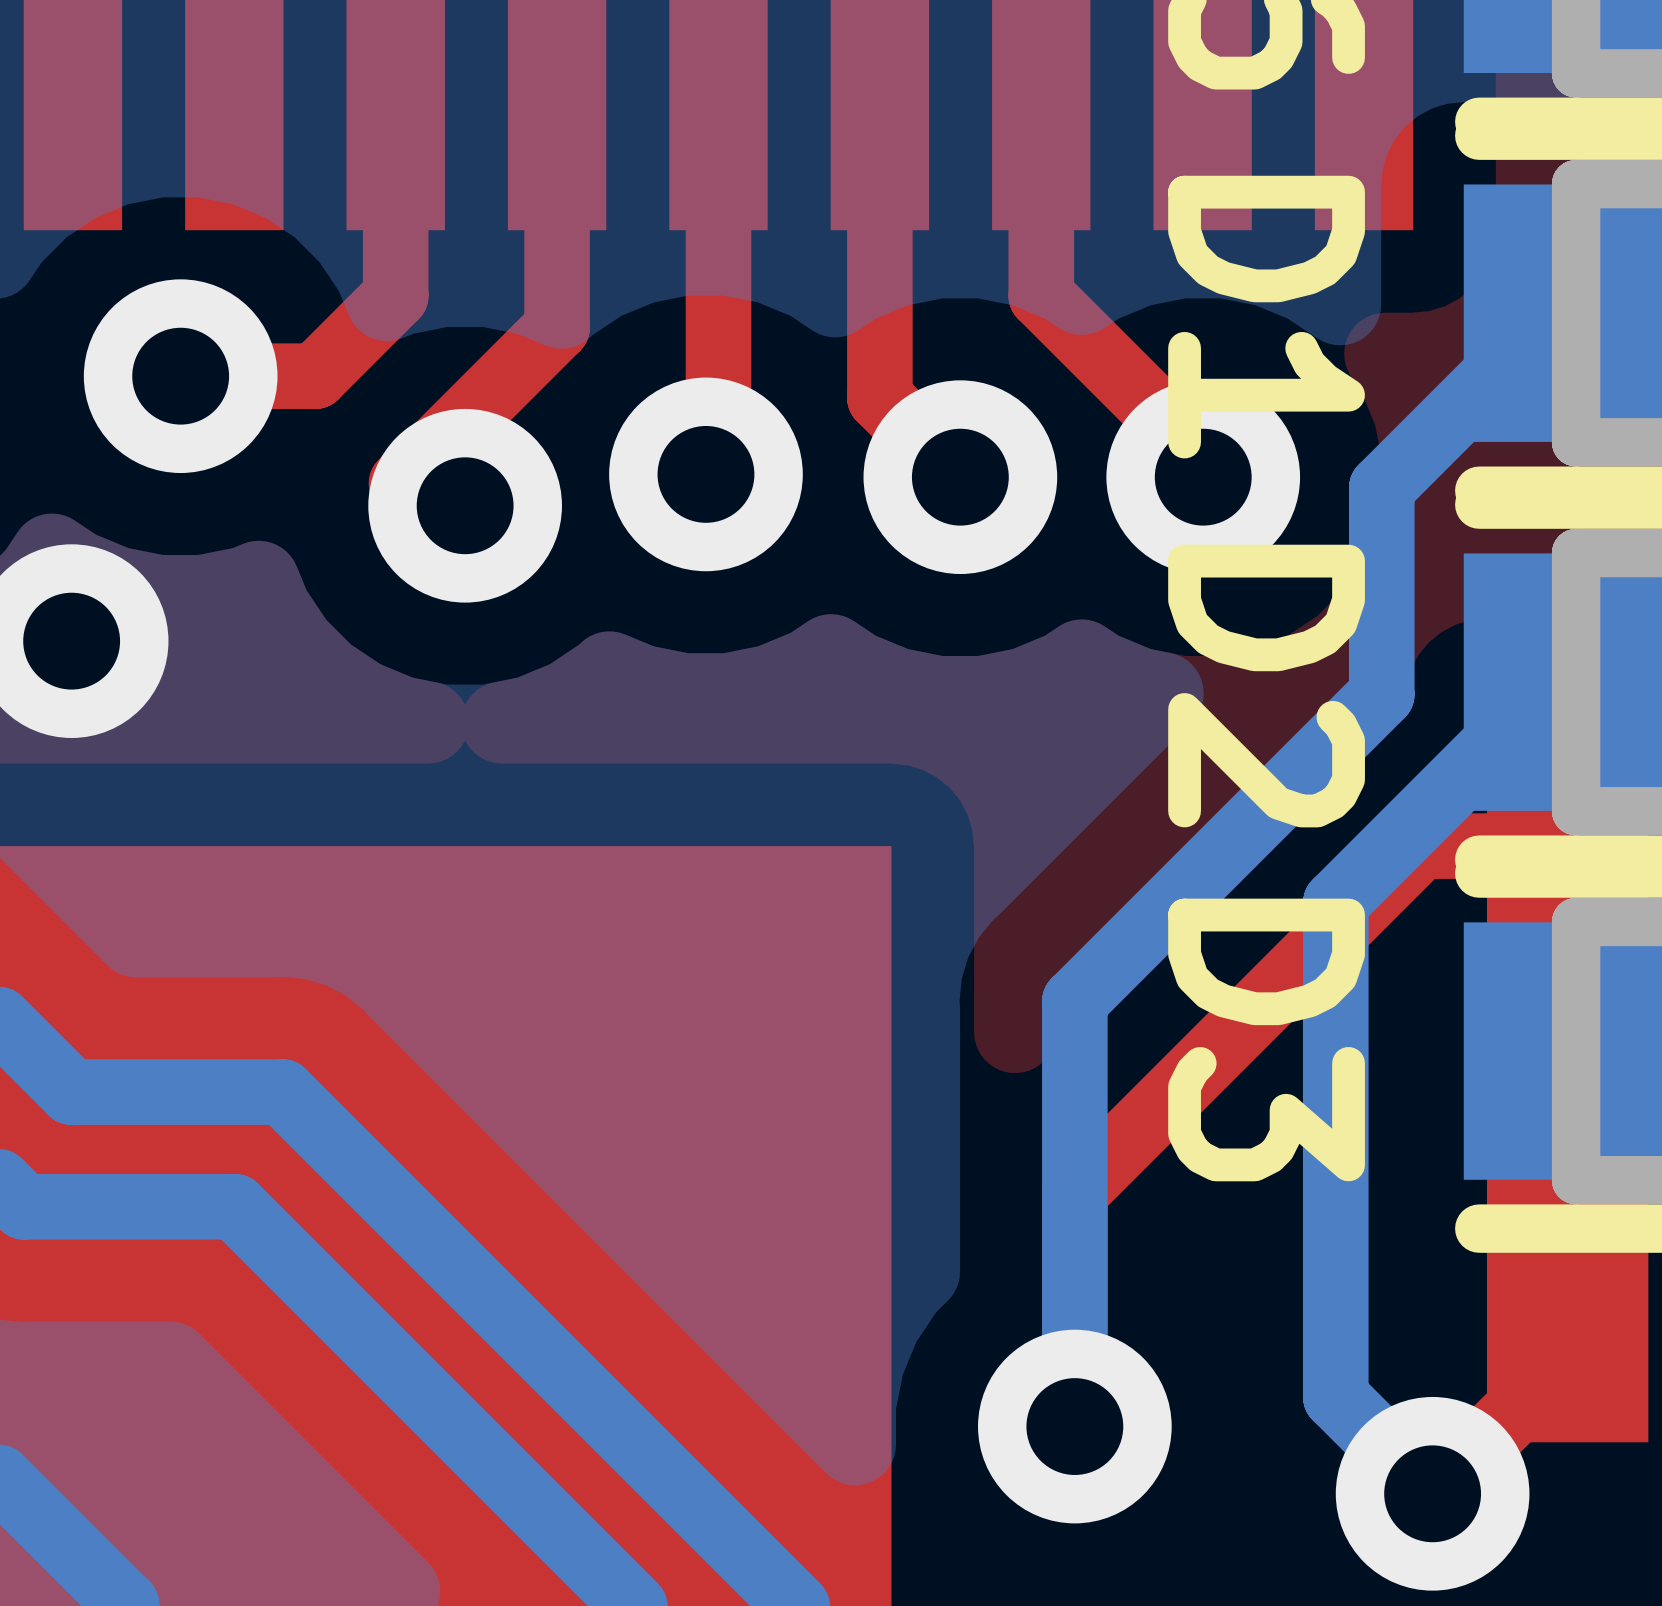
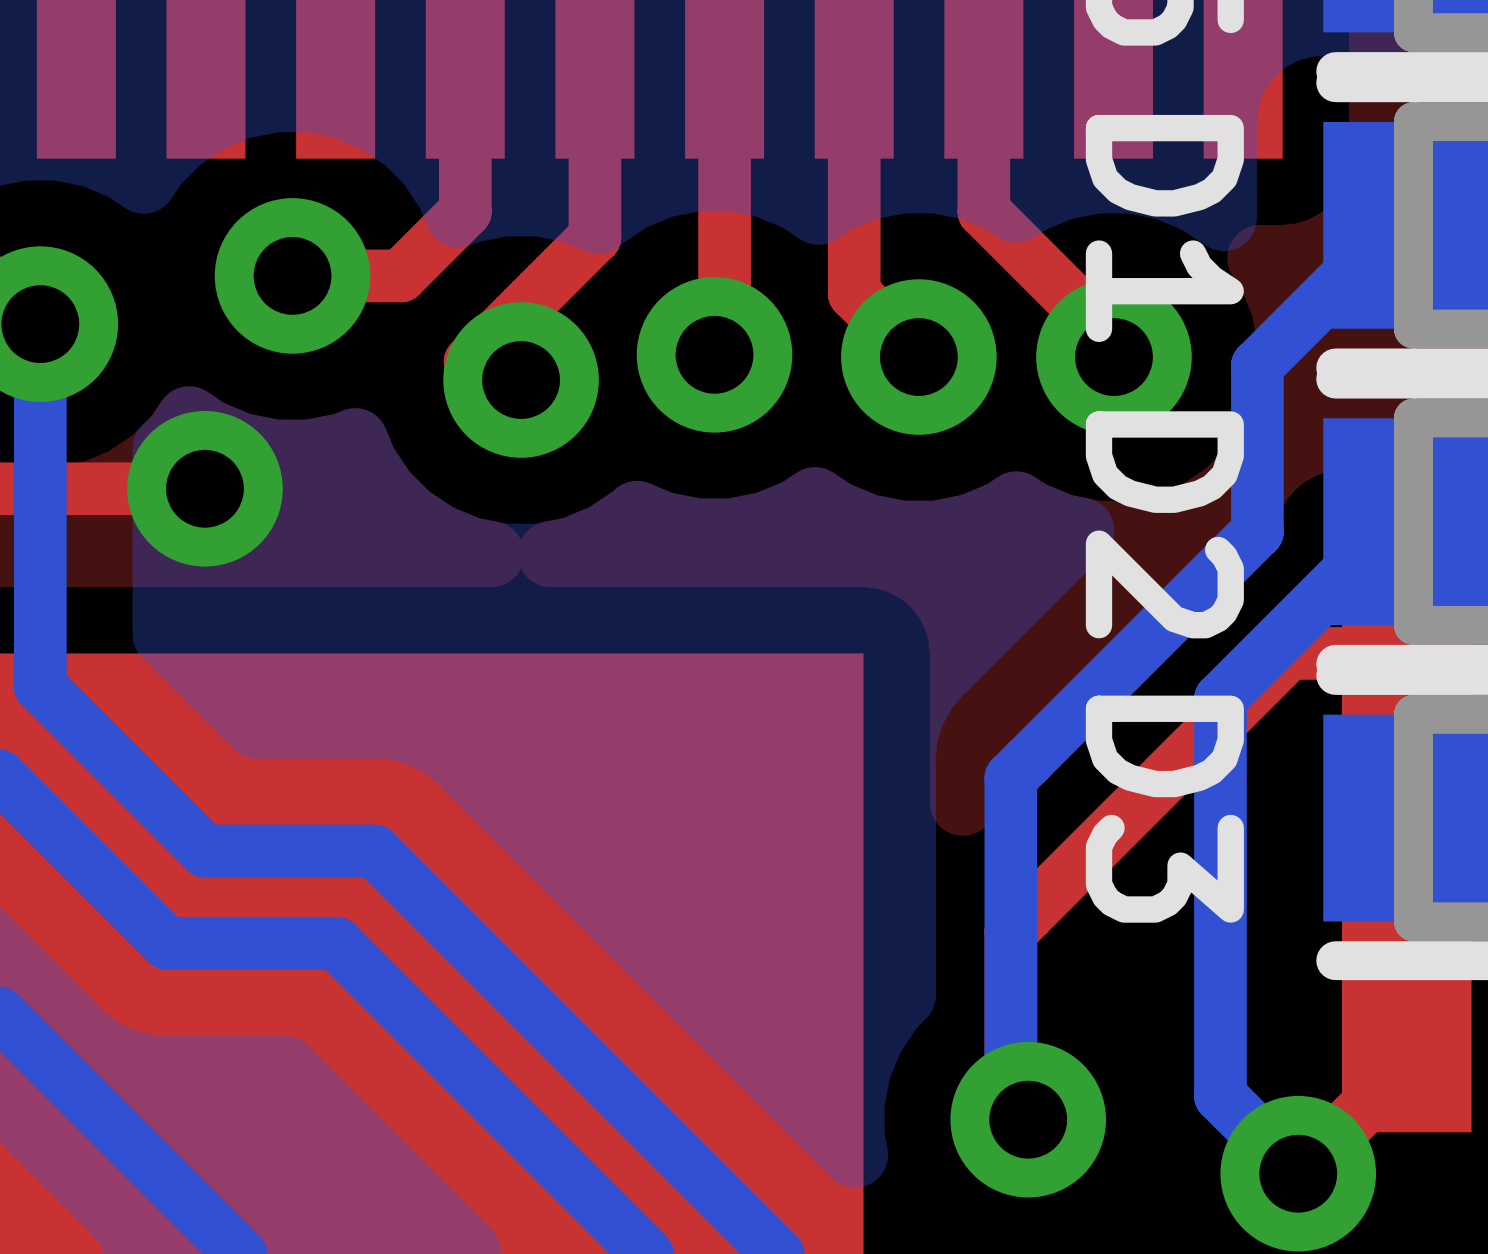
via position: (1074, 1426) -> (1028, 1119)

